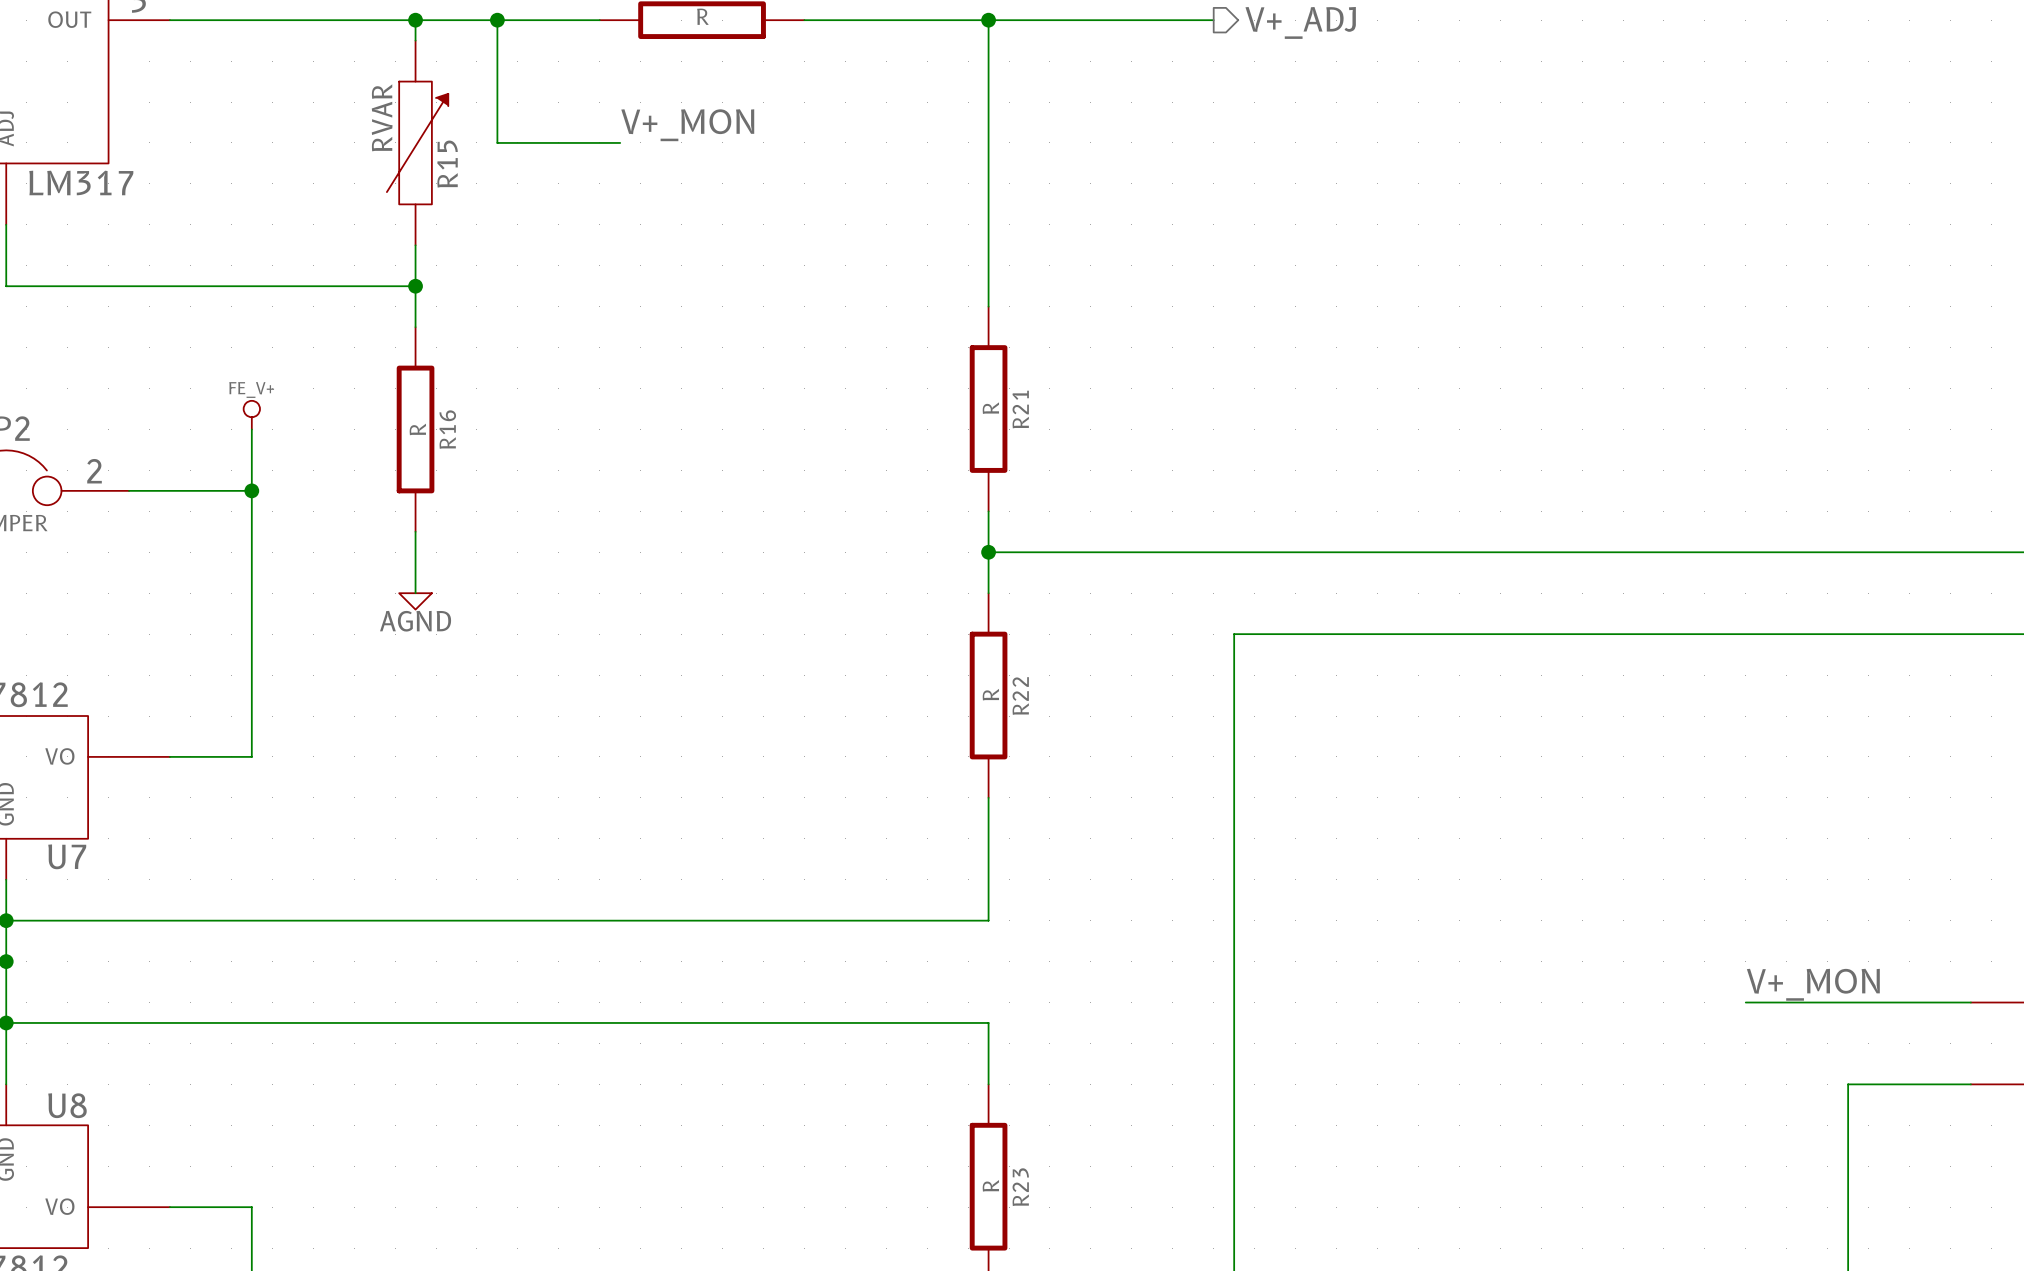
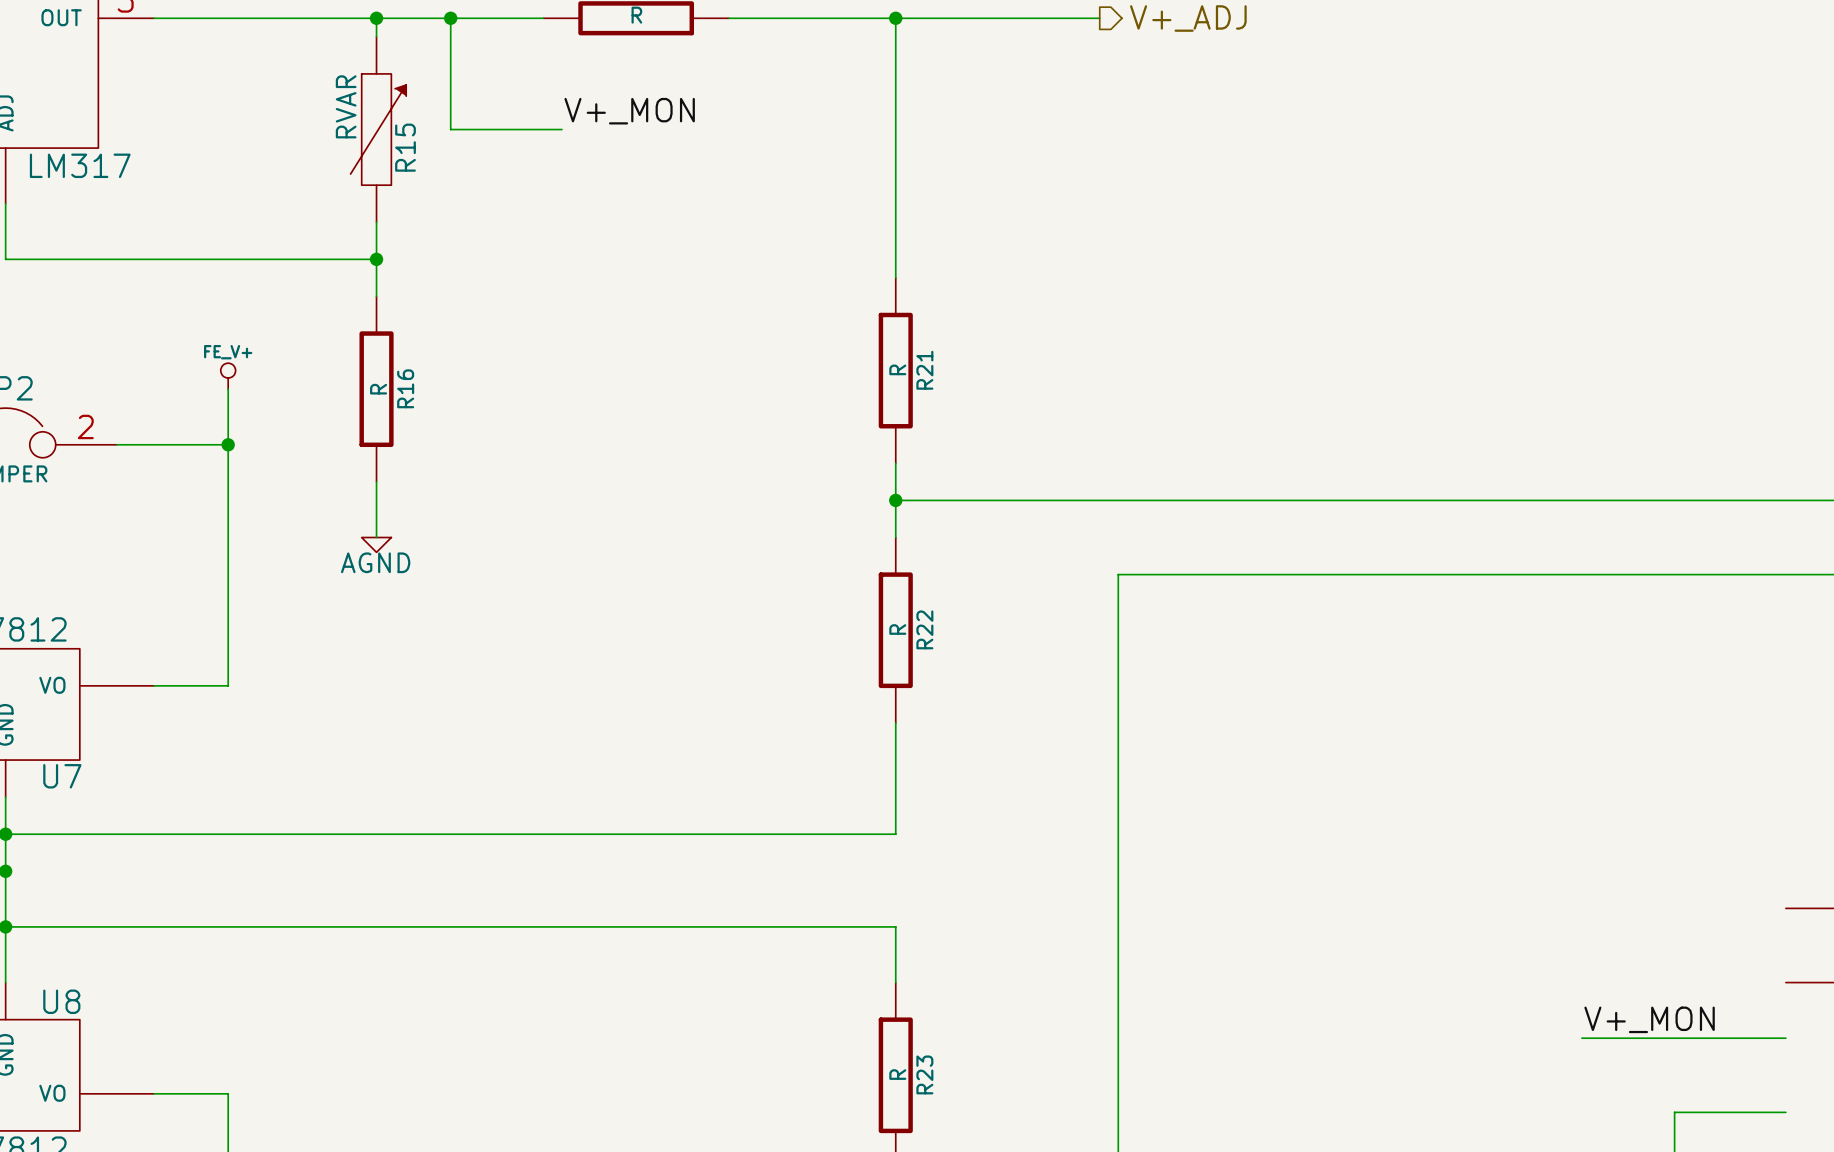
label position: V+_MON (1813, 984) -> V+_MON (1649, 1019)
wire: (1745, 1002) (1970, 1002) -> (1581, 1038) (1785, 1038)
wire: (1970, 1084) (1848, 1084) (1848, 1227) -> (1785, 1112) (1674, 1112)

